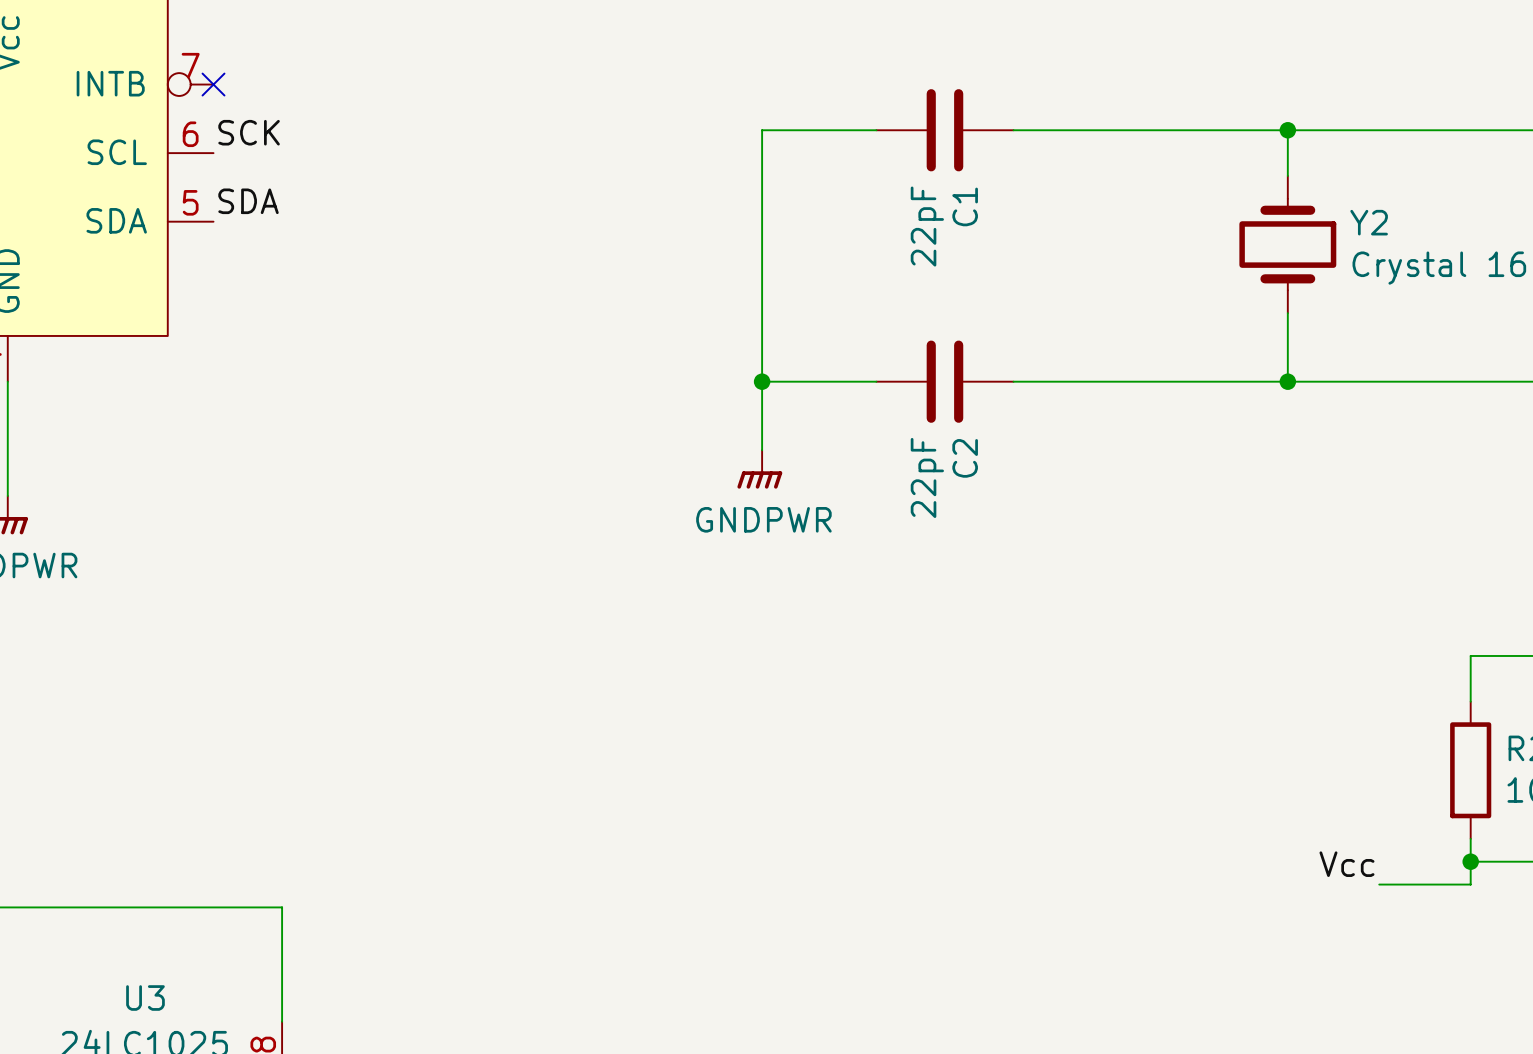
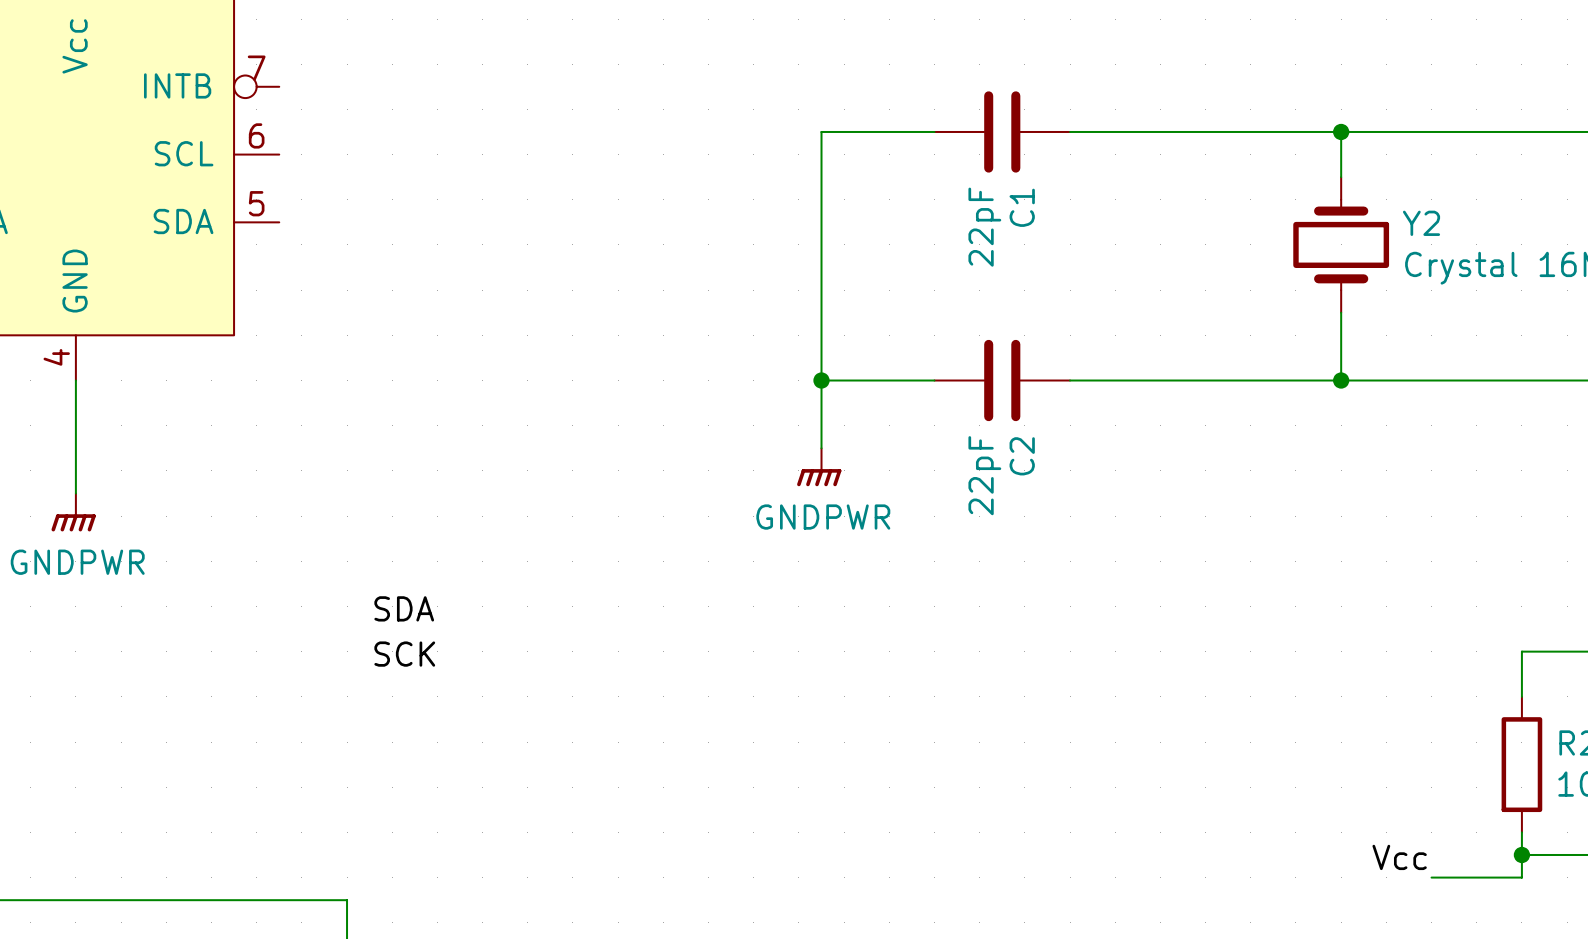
no-connect mark: (213, 84) -> none
label: SCK (249, 132) -> none
label: SDA (248, 201) -> none
label: none -> SDA (404, 608)
label: none -> SCK (404, 654)

